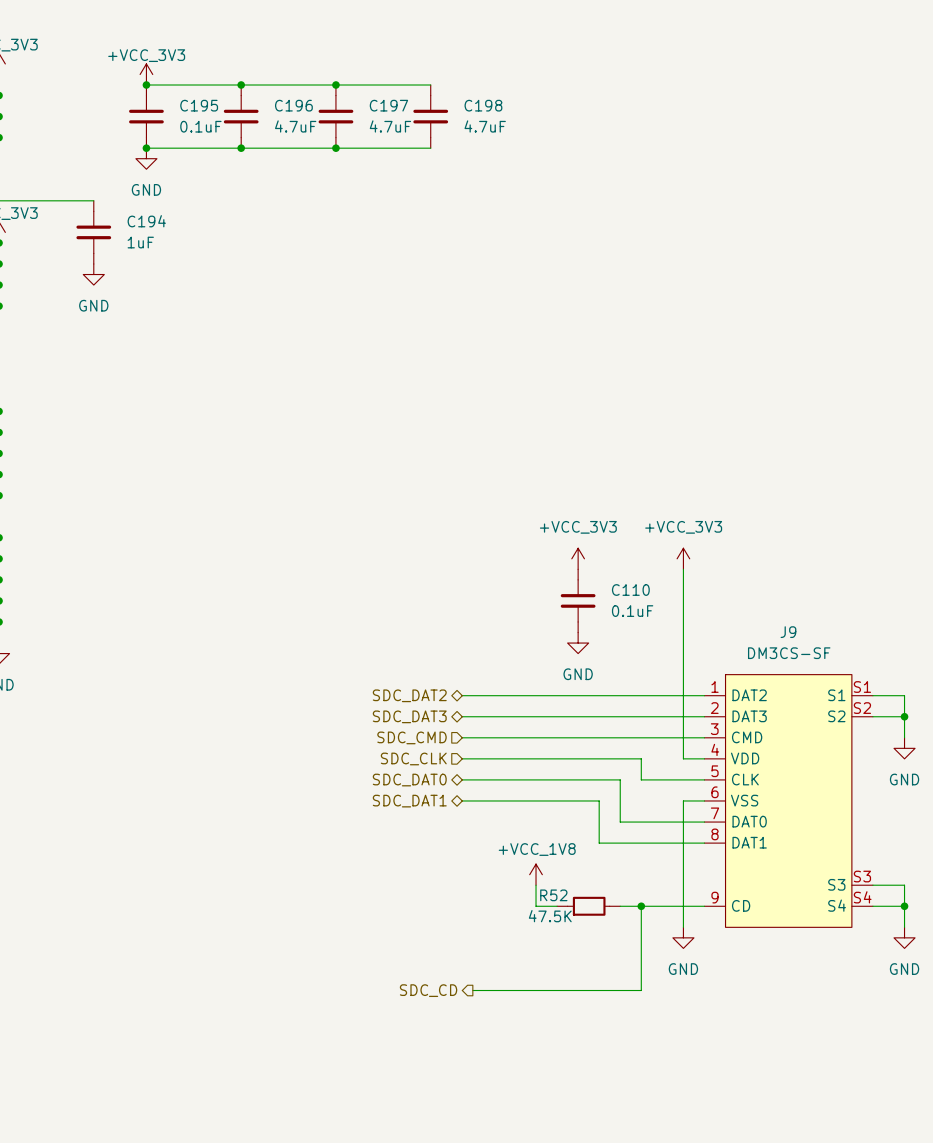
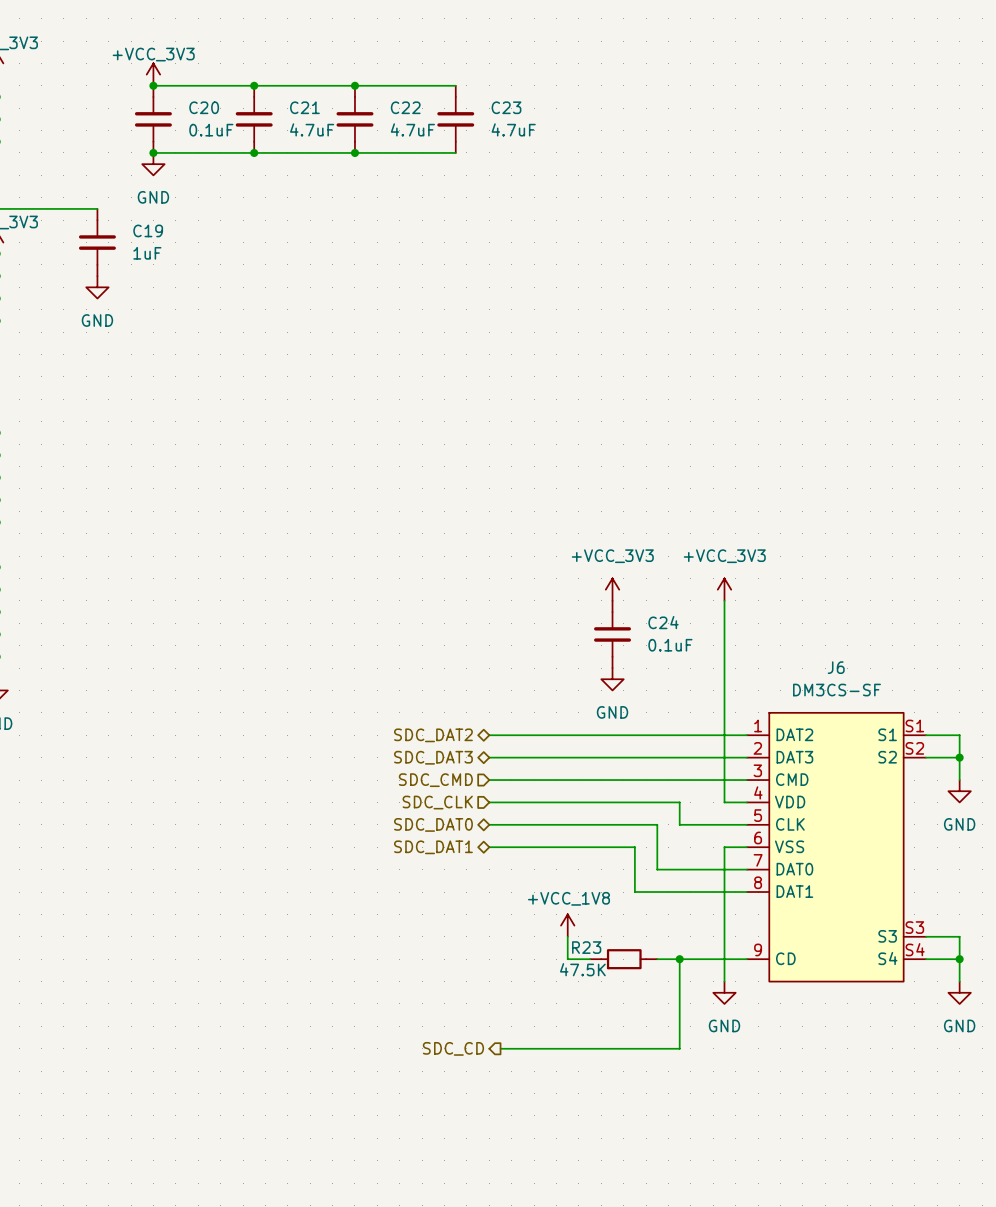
C195 name: C195 (199, 105) -> C20 (204, 107)
C196 name: C196 (293, 105) -> C21 (304, 107)
C197 name: C197 (388, 105) -> C22 (405, 107)
C198 name: C198 (483, 105) -> C23 (506, 107)
C194 name: C194 (146, 221) -> C19 (148, 230)
C110 name: C110 (630, 590) -> C24 (663, 622)
J9 name: J9 (788, 632) -> J6 (836, 667)
R52 name: R52 (553, 895) -> R23 (586, 947)

